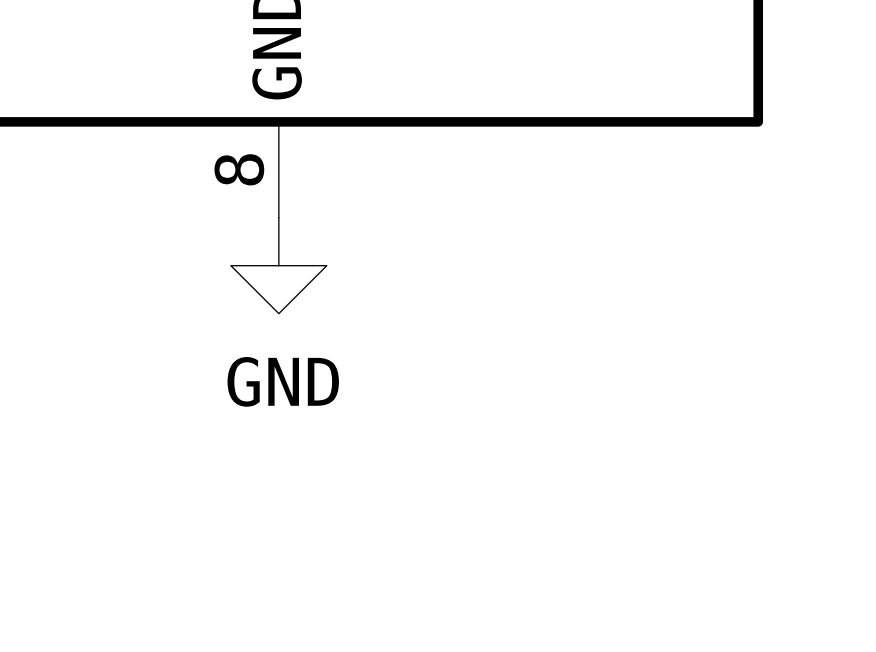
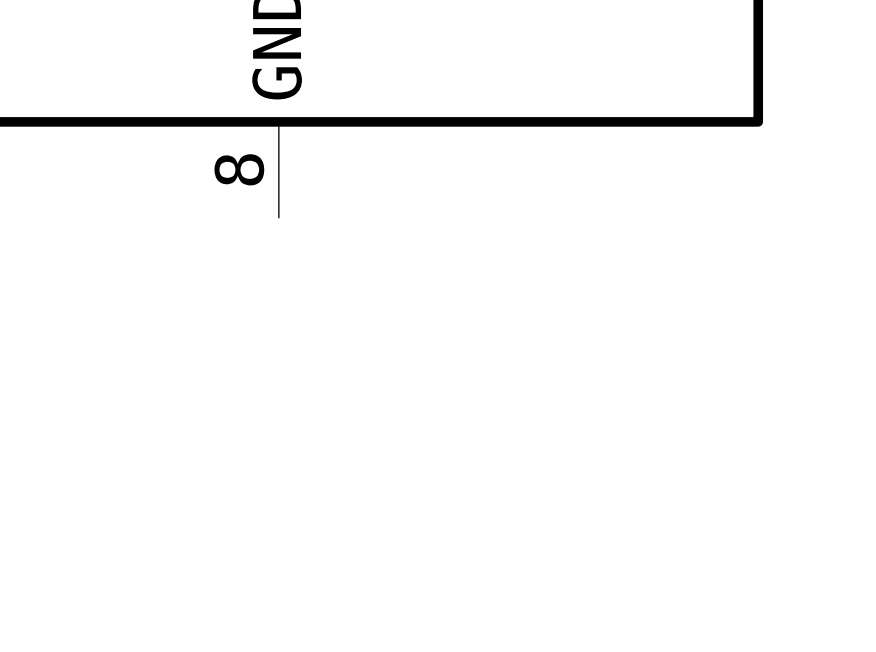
power symbol: GND (278, 265) -> none

